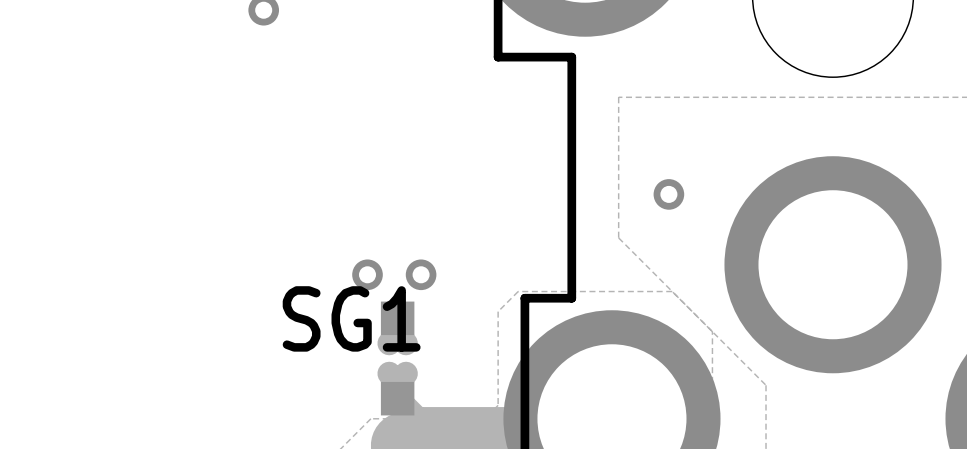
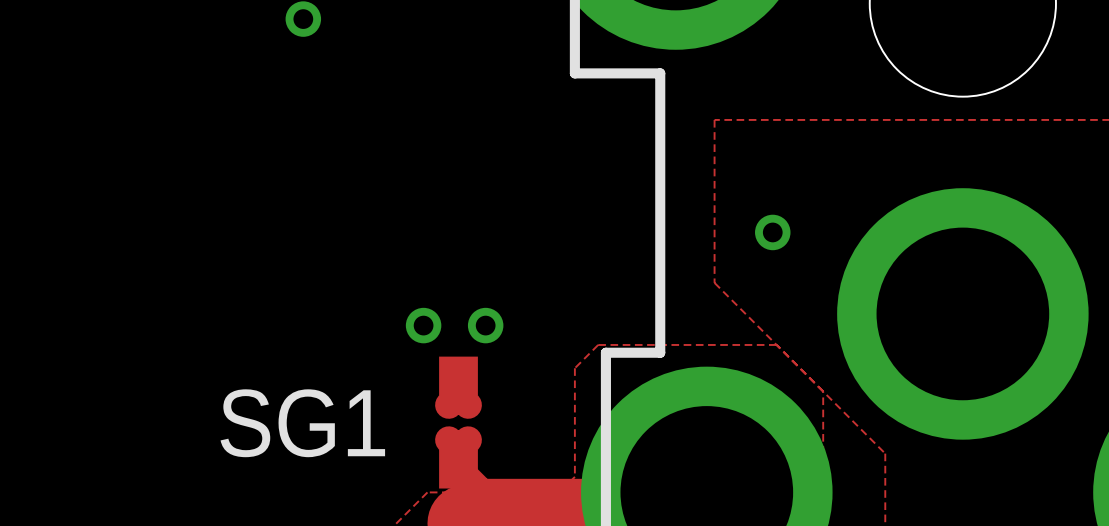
SG1 name position: SG1 (351, 318) -> SG1 (302, 423)

